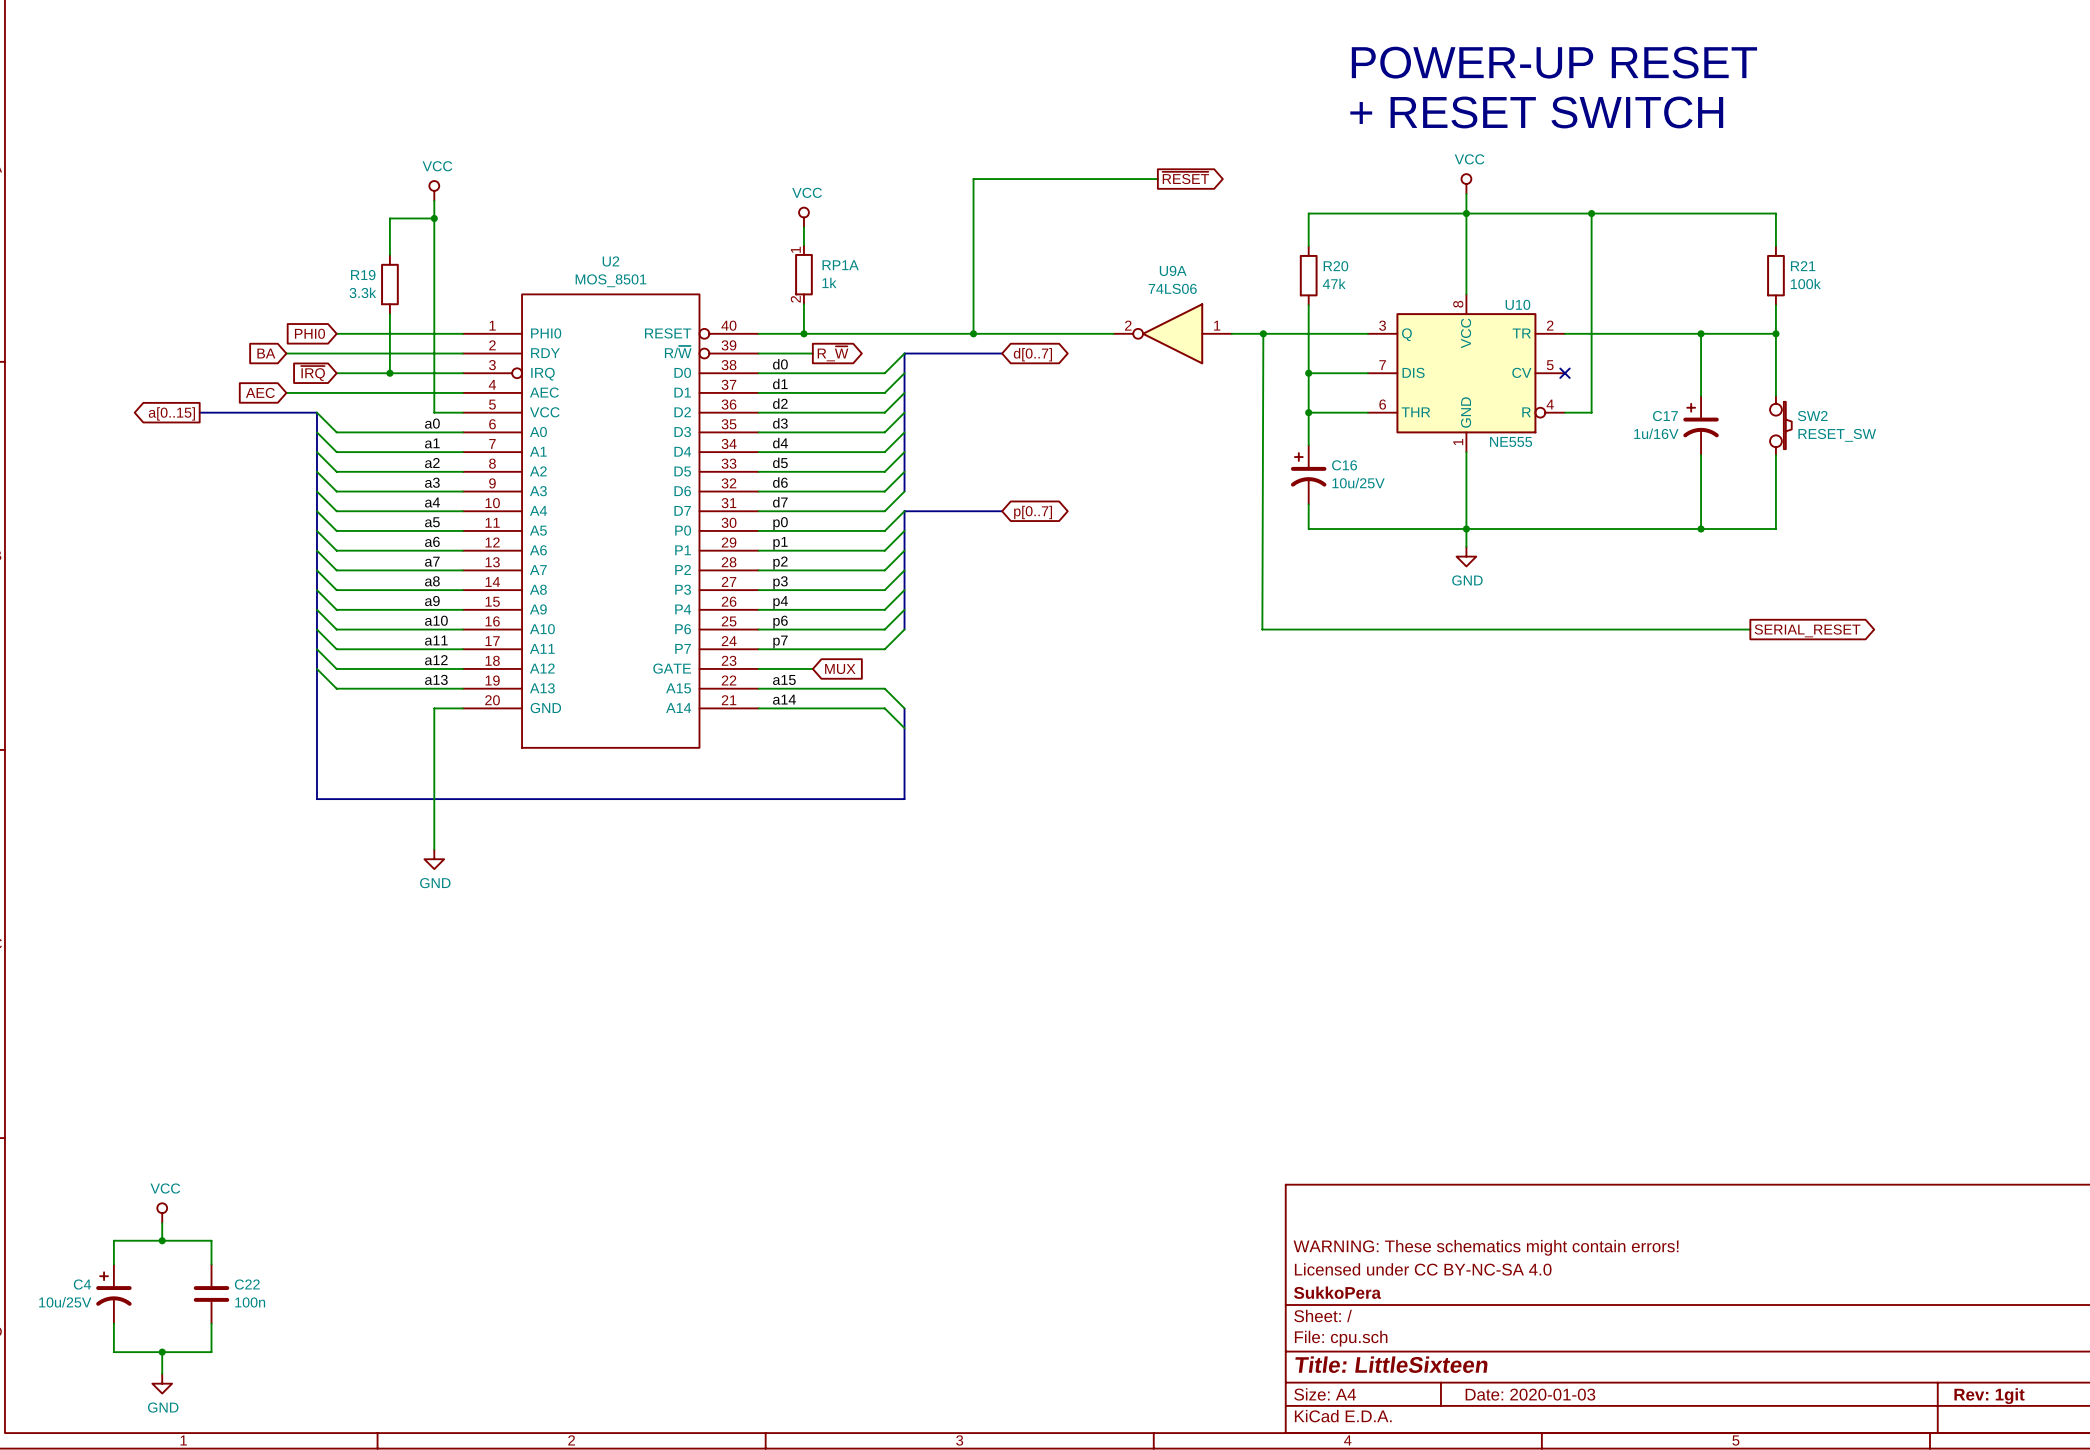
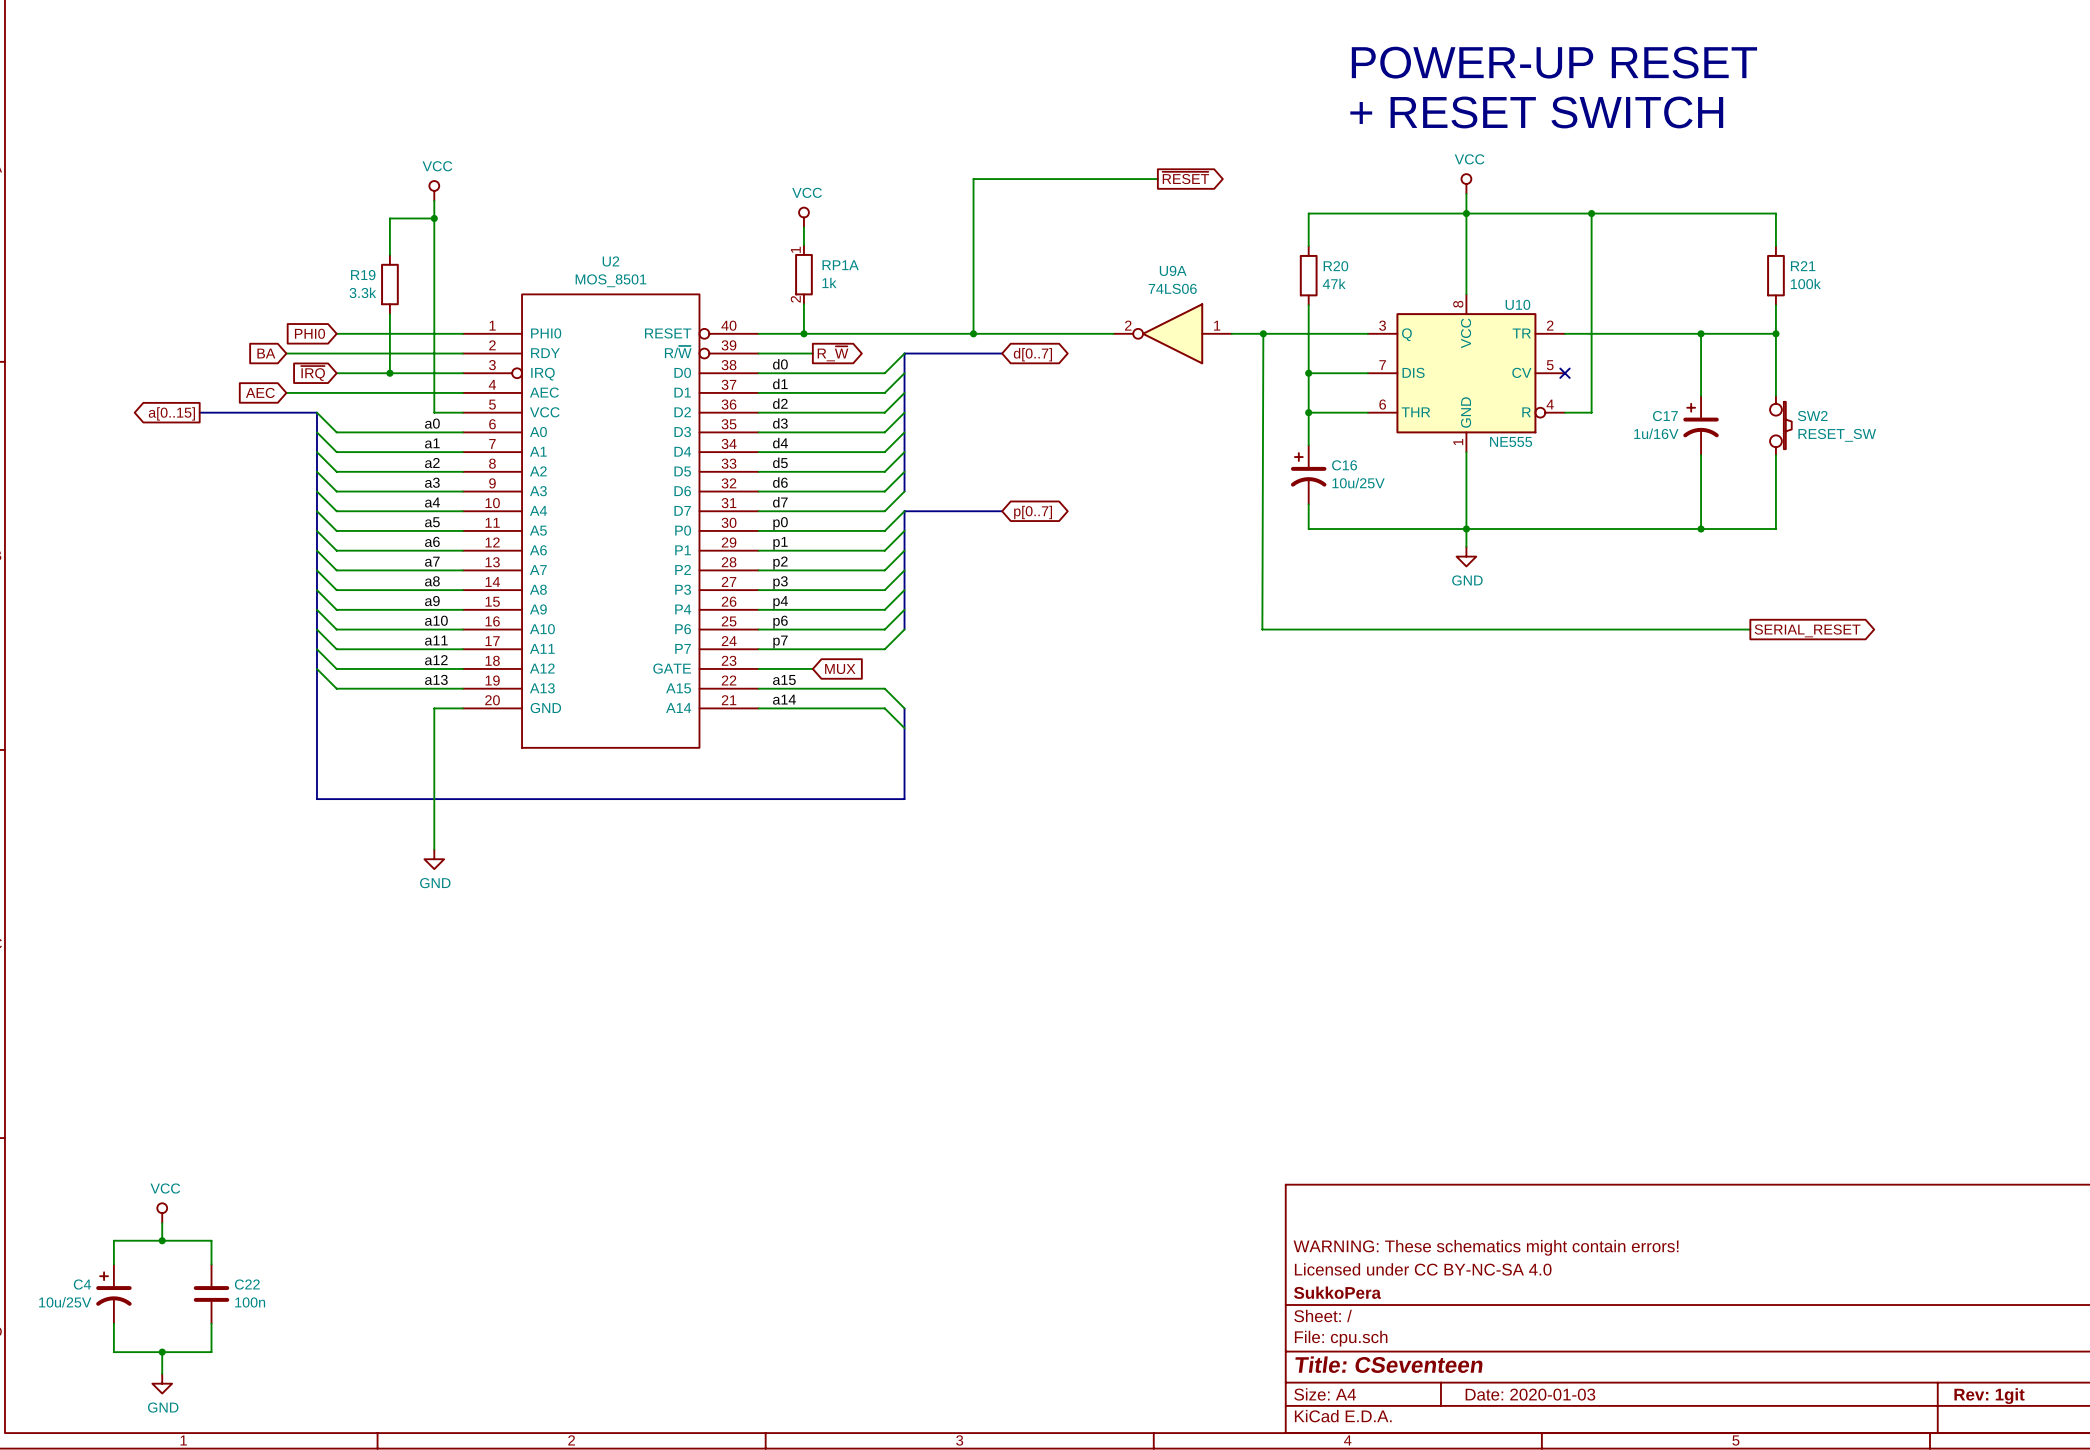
title block: Title: LittleSixteen (1391, 1364) -> Title: CSeventeen (1389, 1364)

